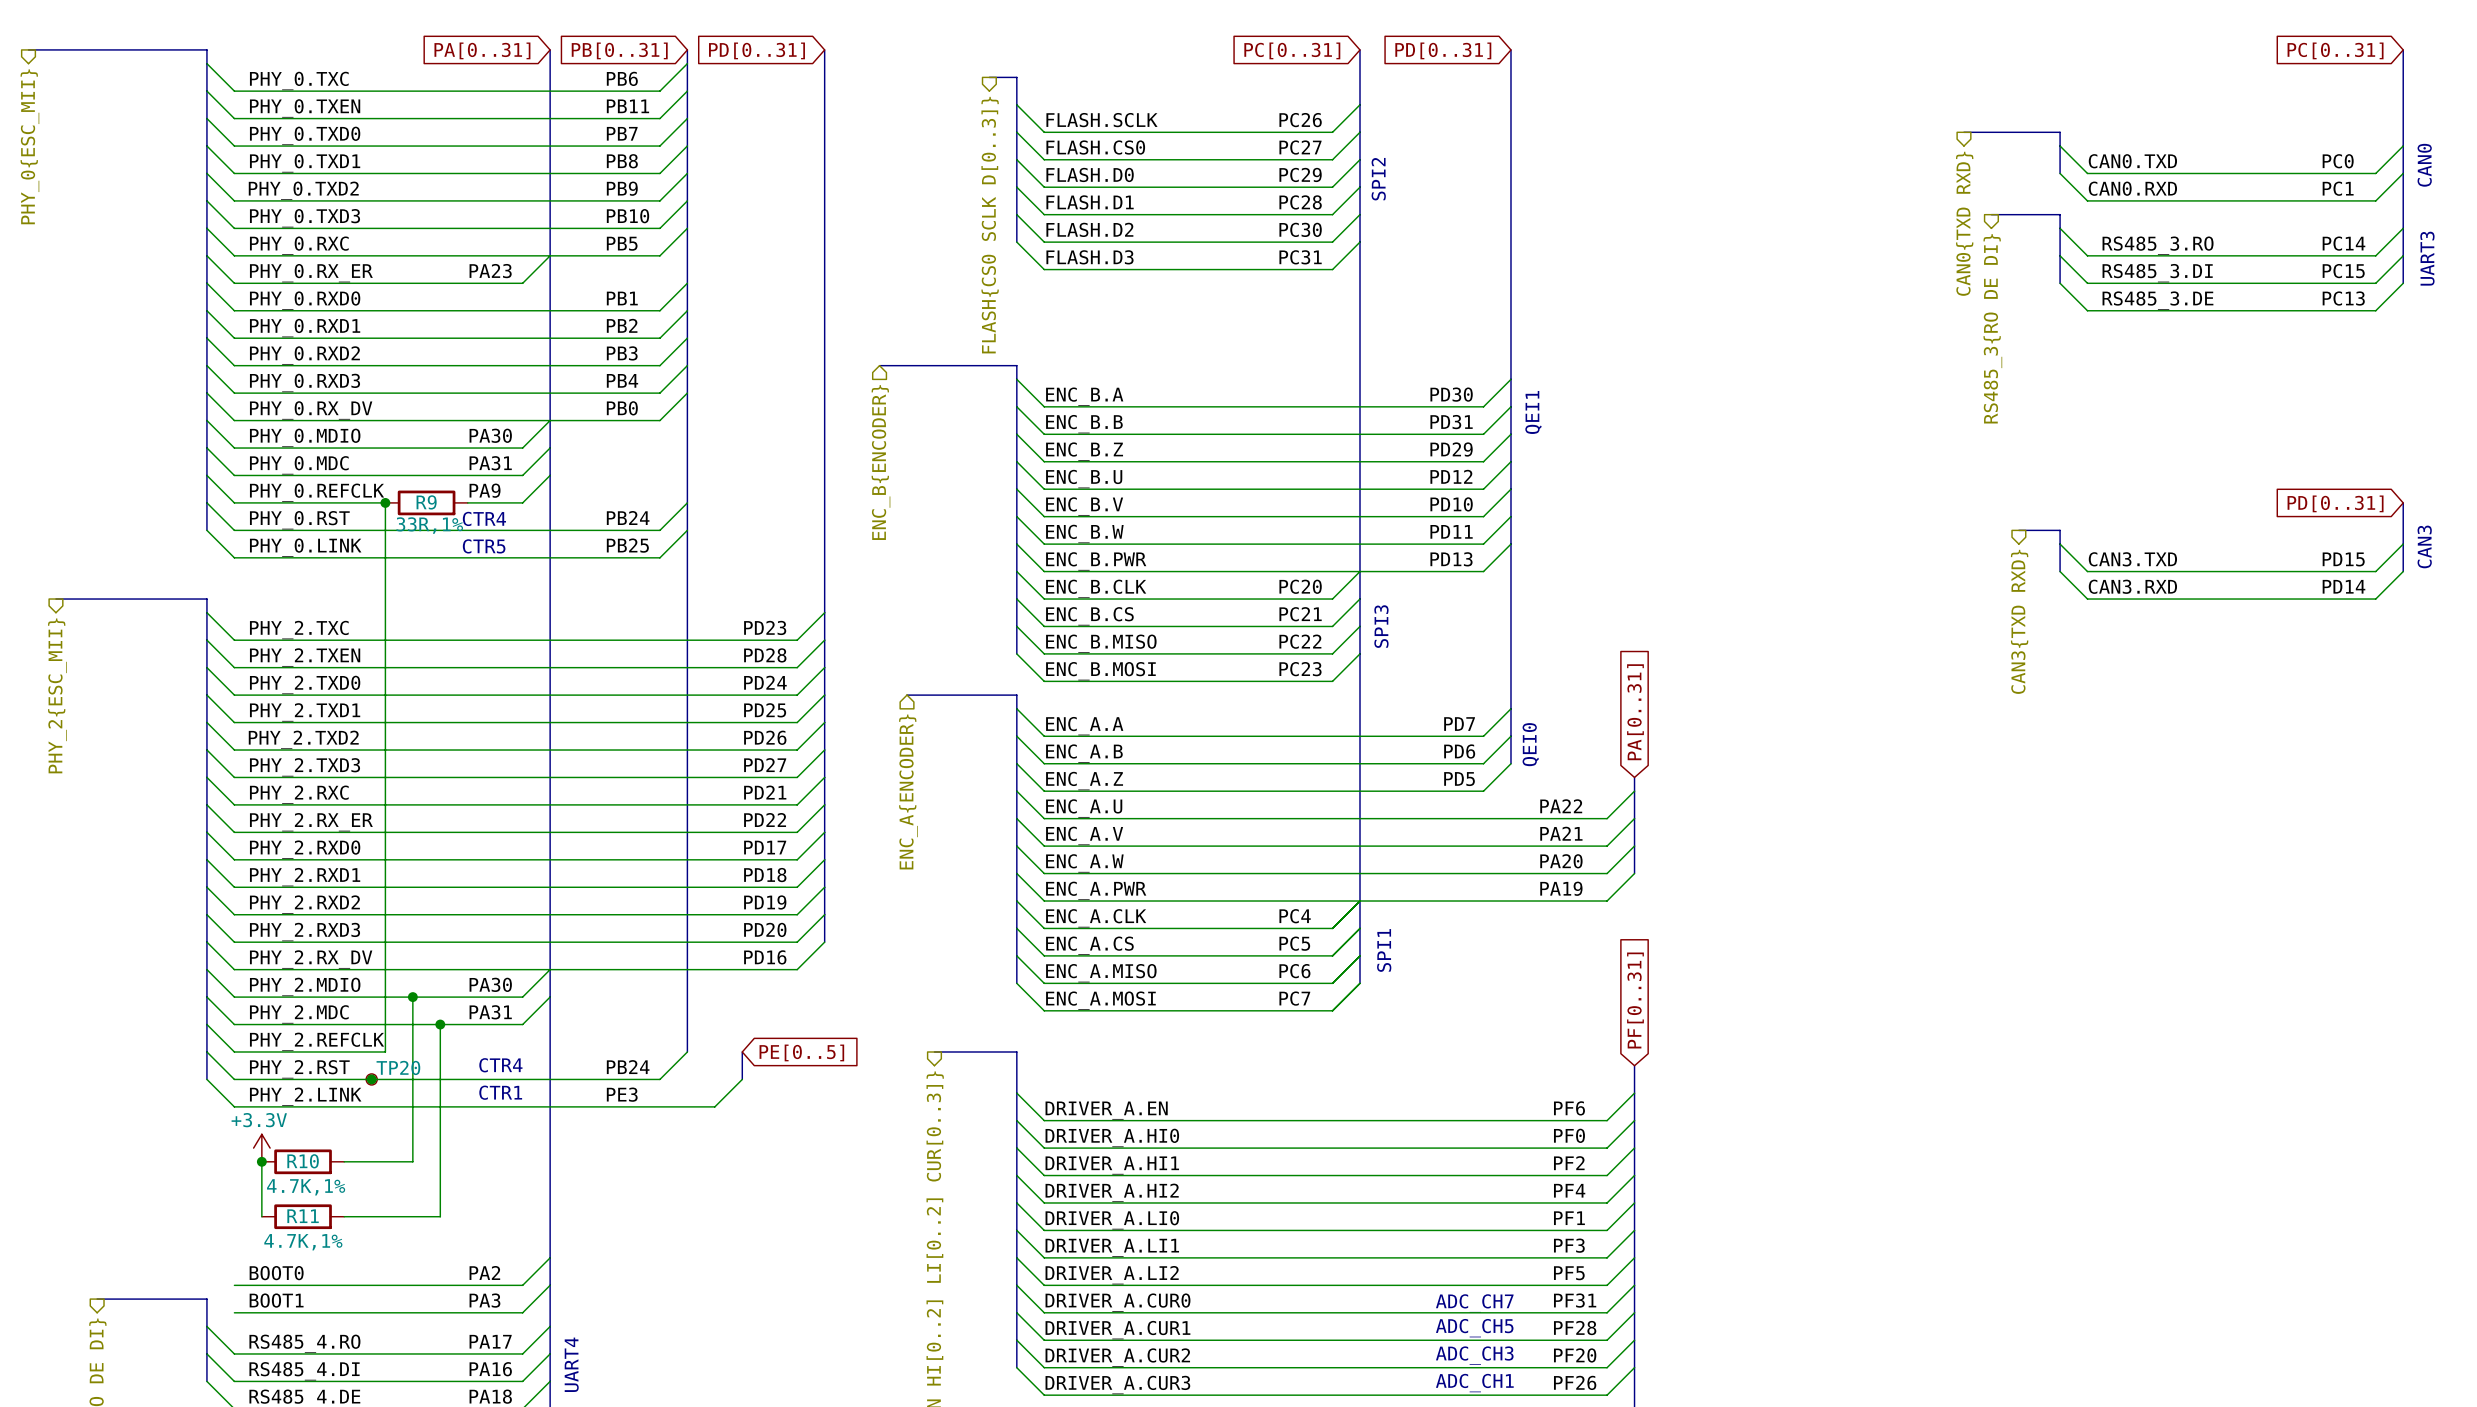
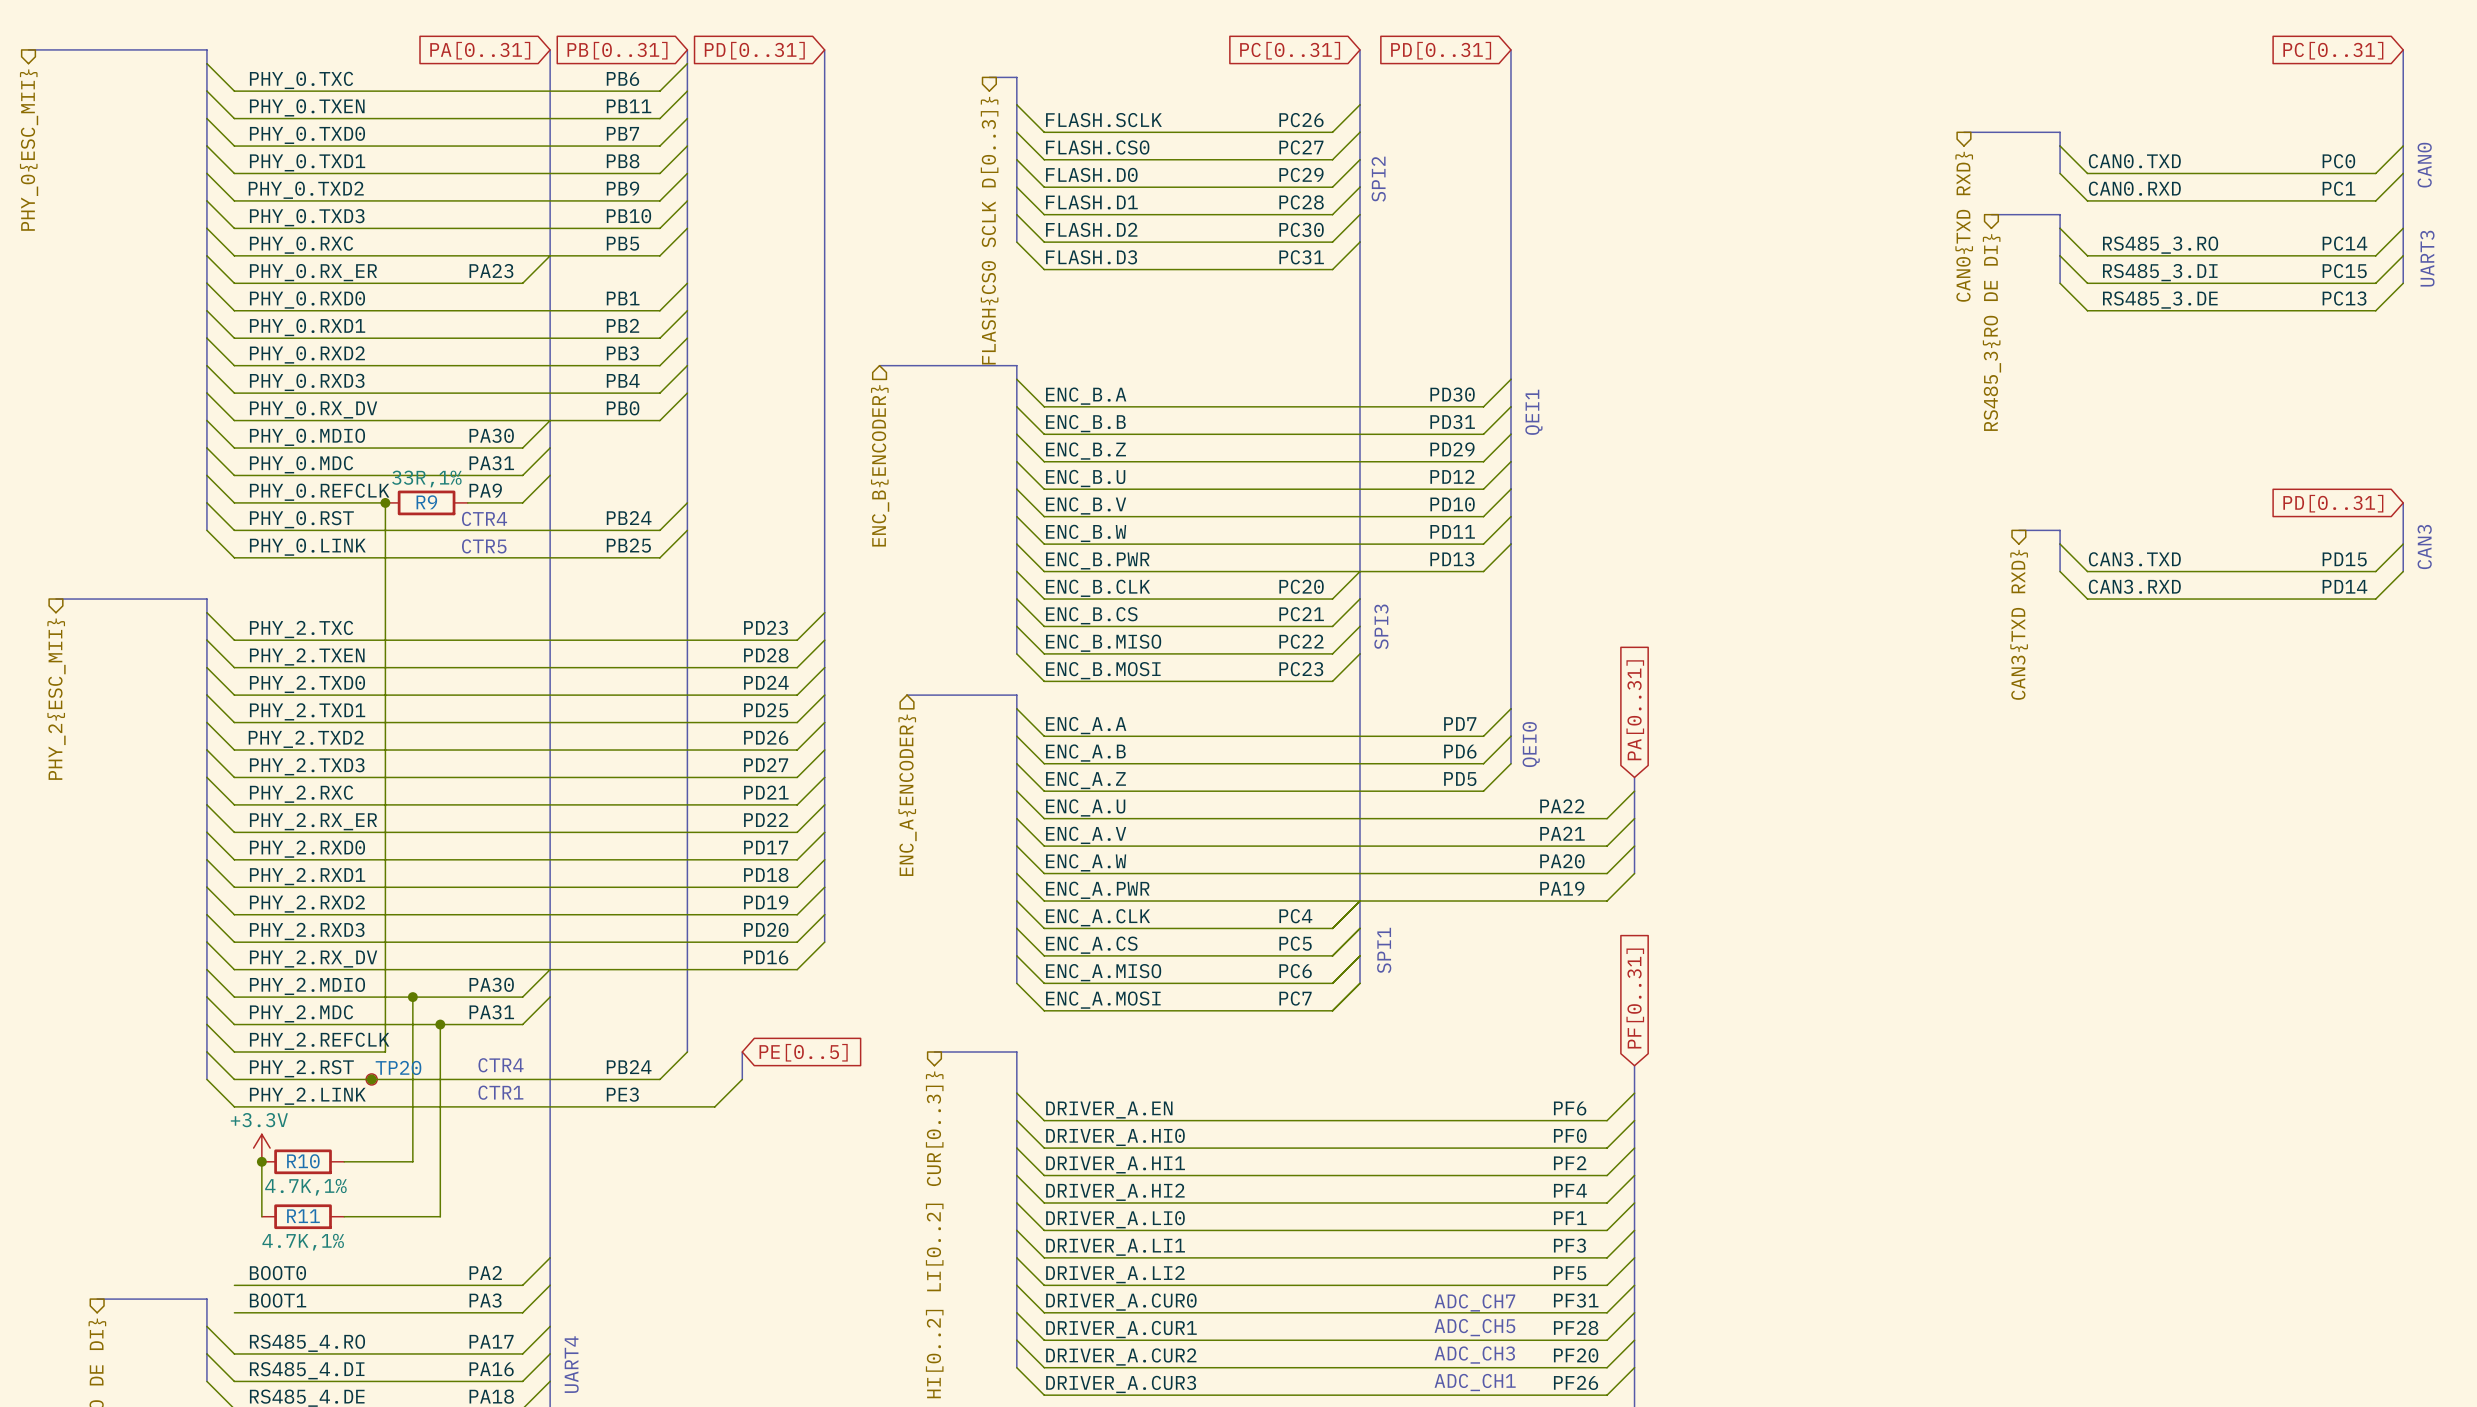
R9 value position: 33R,1% (429, 525) -> 33R,1% (426, 478)

